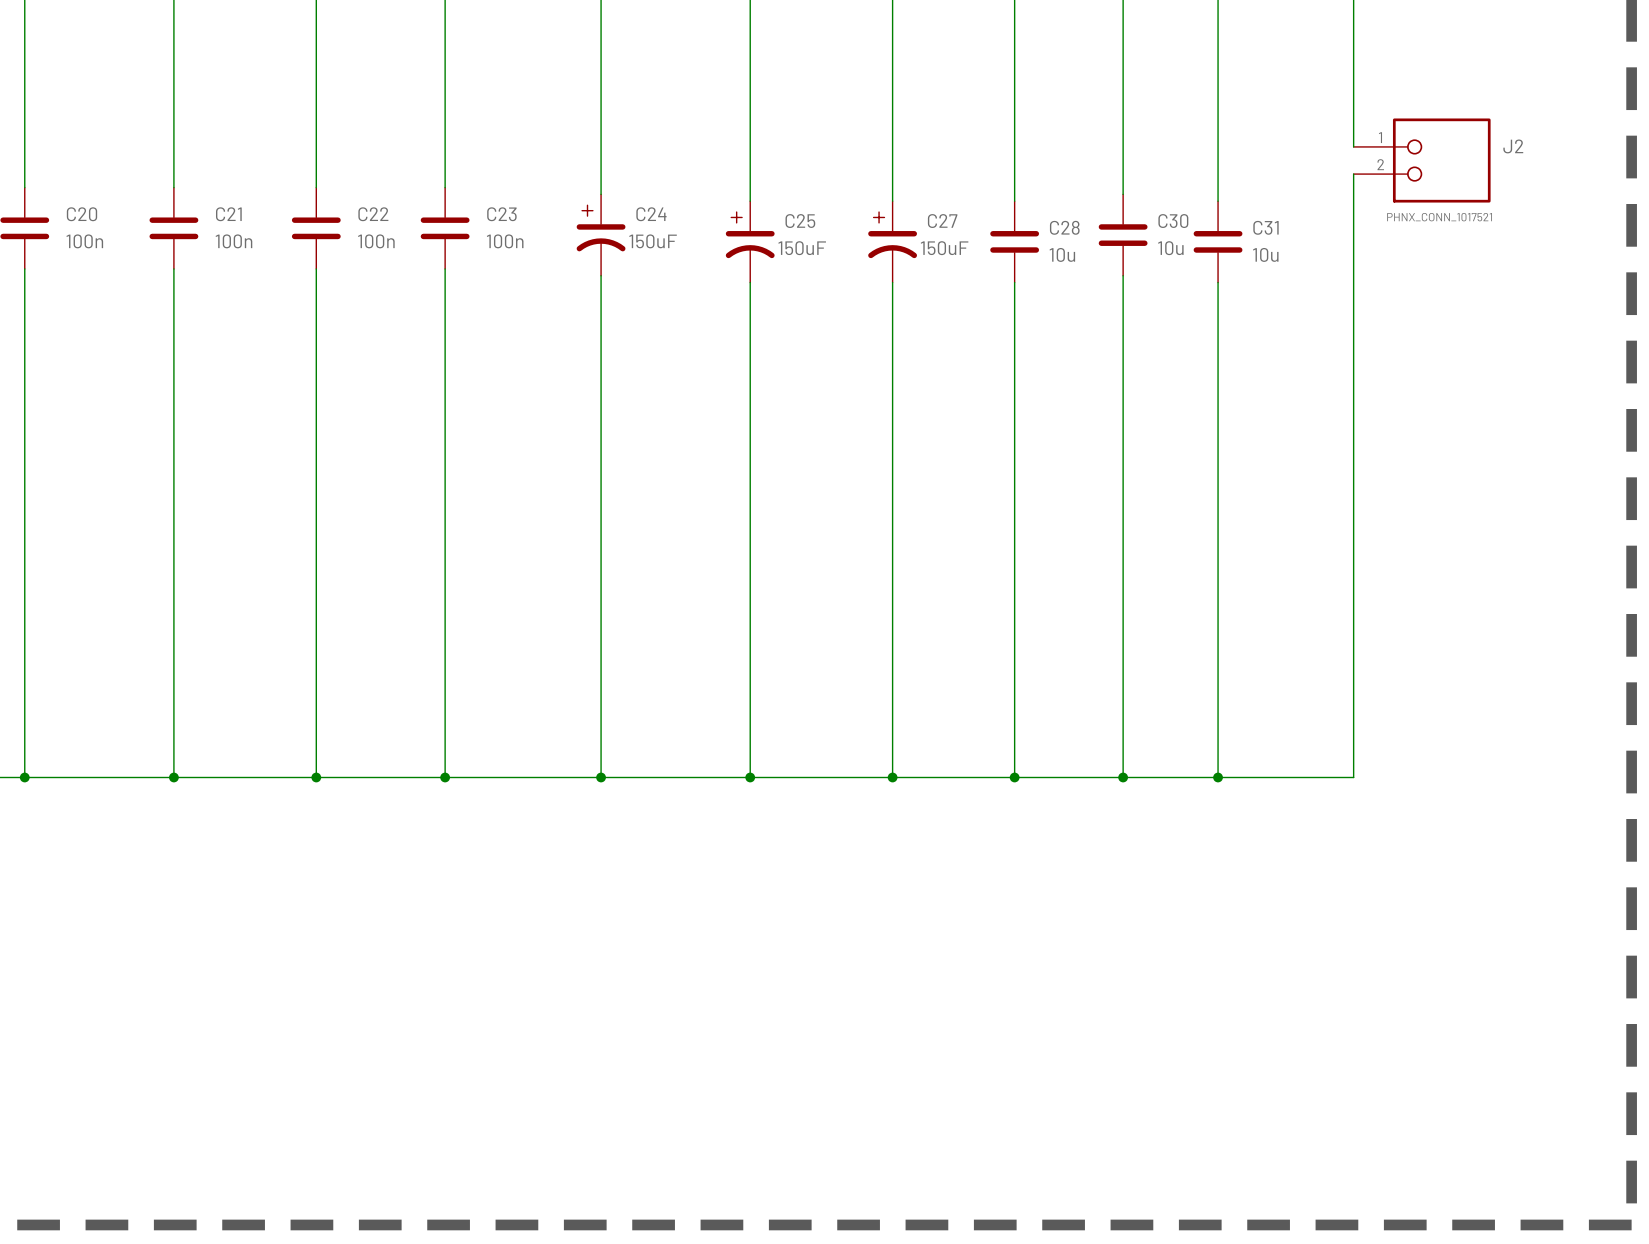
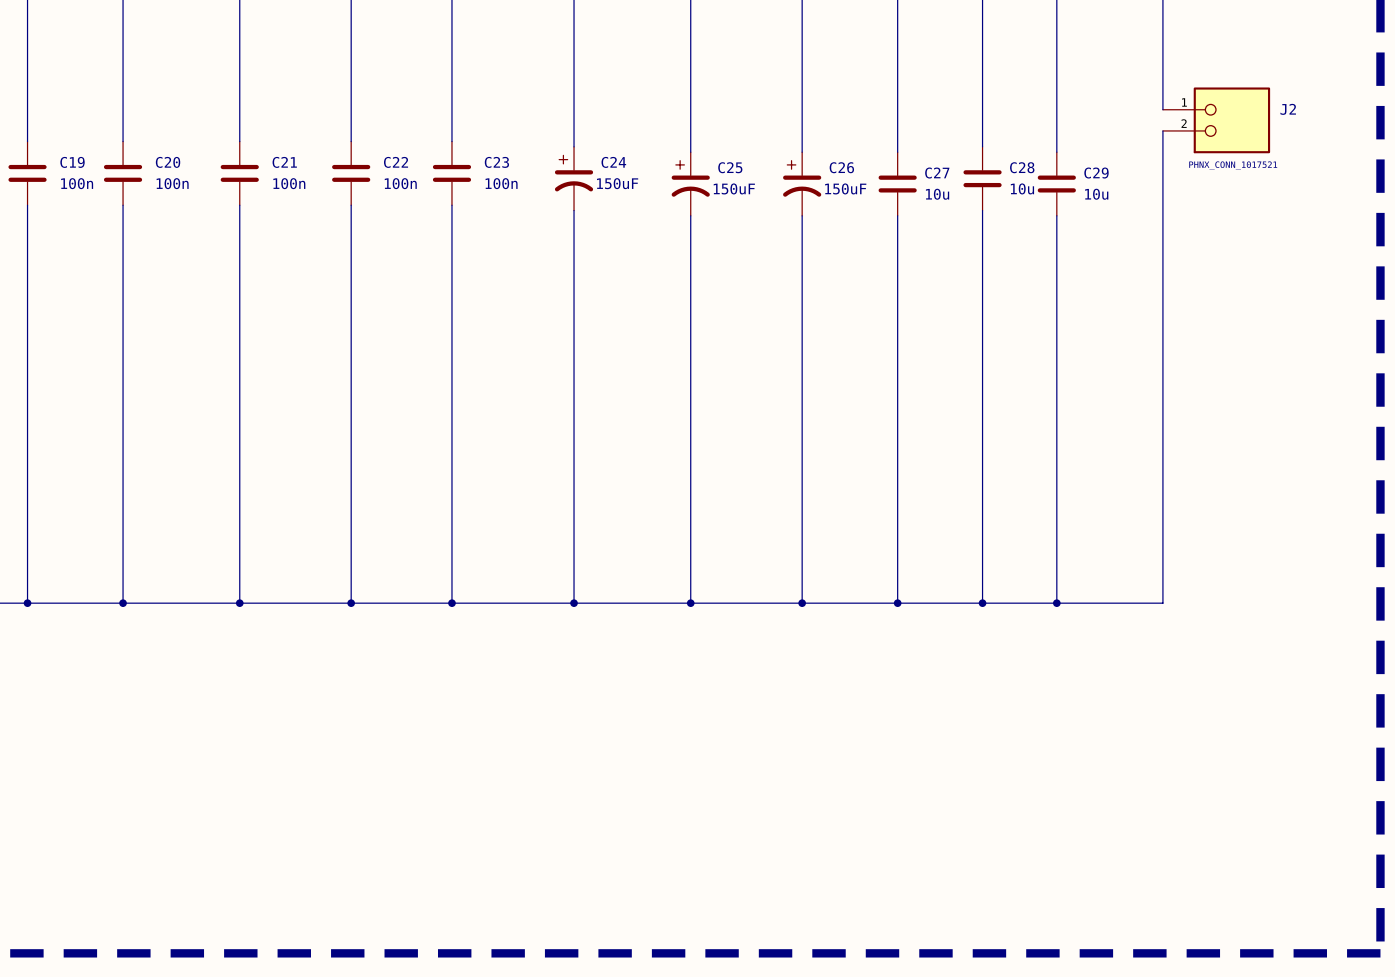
C27 name: C27 (942, 221) -> C26 (841, 167)
C30 name: C30 (1173, 221) -> C28 (1022, 167)
C28 name: C28 (1064, 227) -> C27 (937, 173)
C31 name: C31 (1265, 227) -> C29 (1096, 173)

